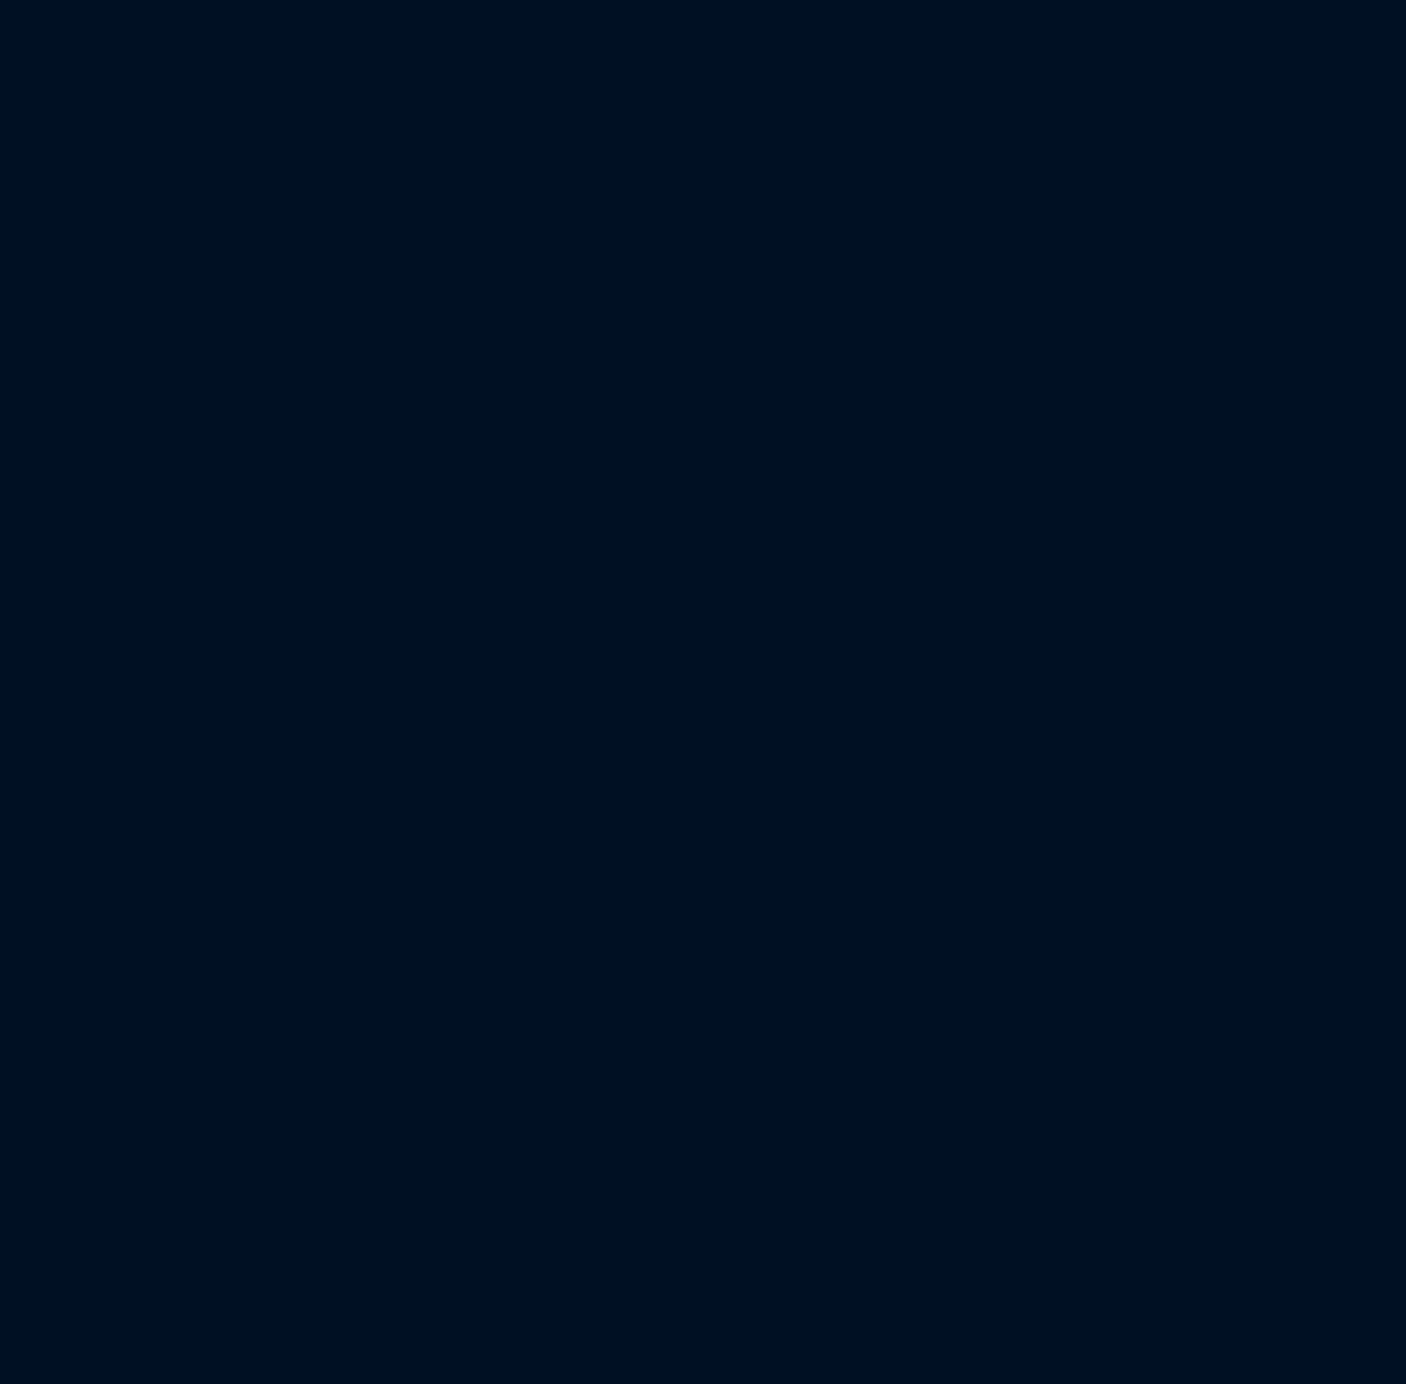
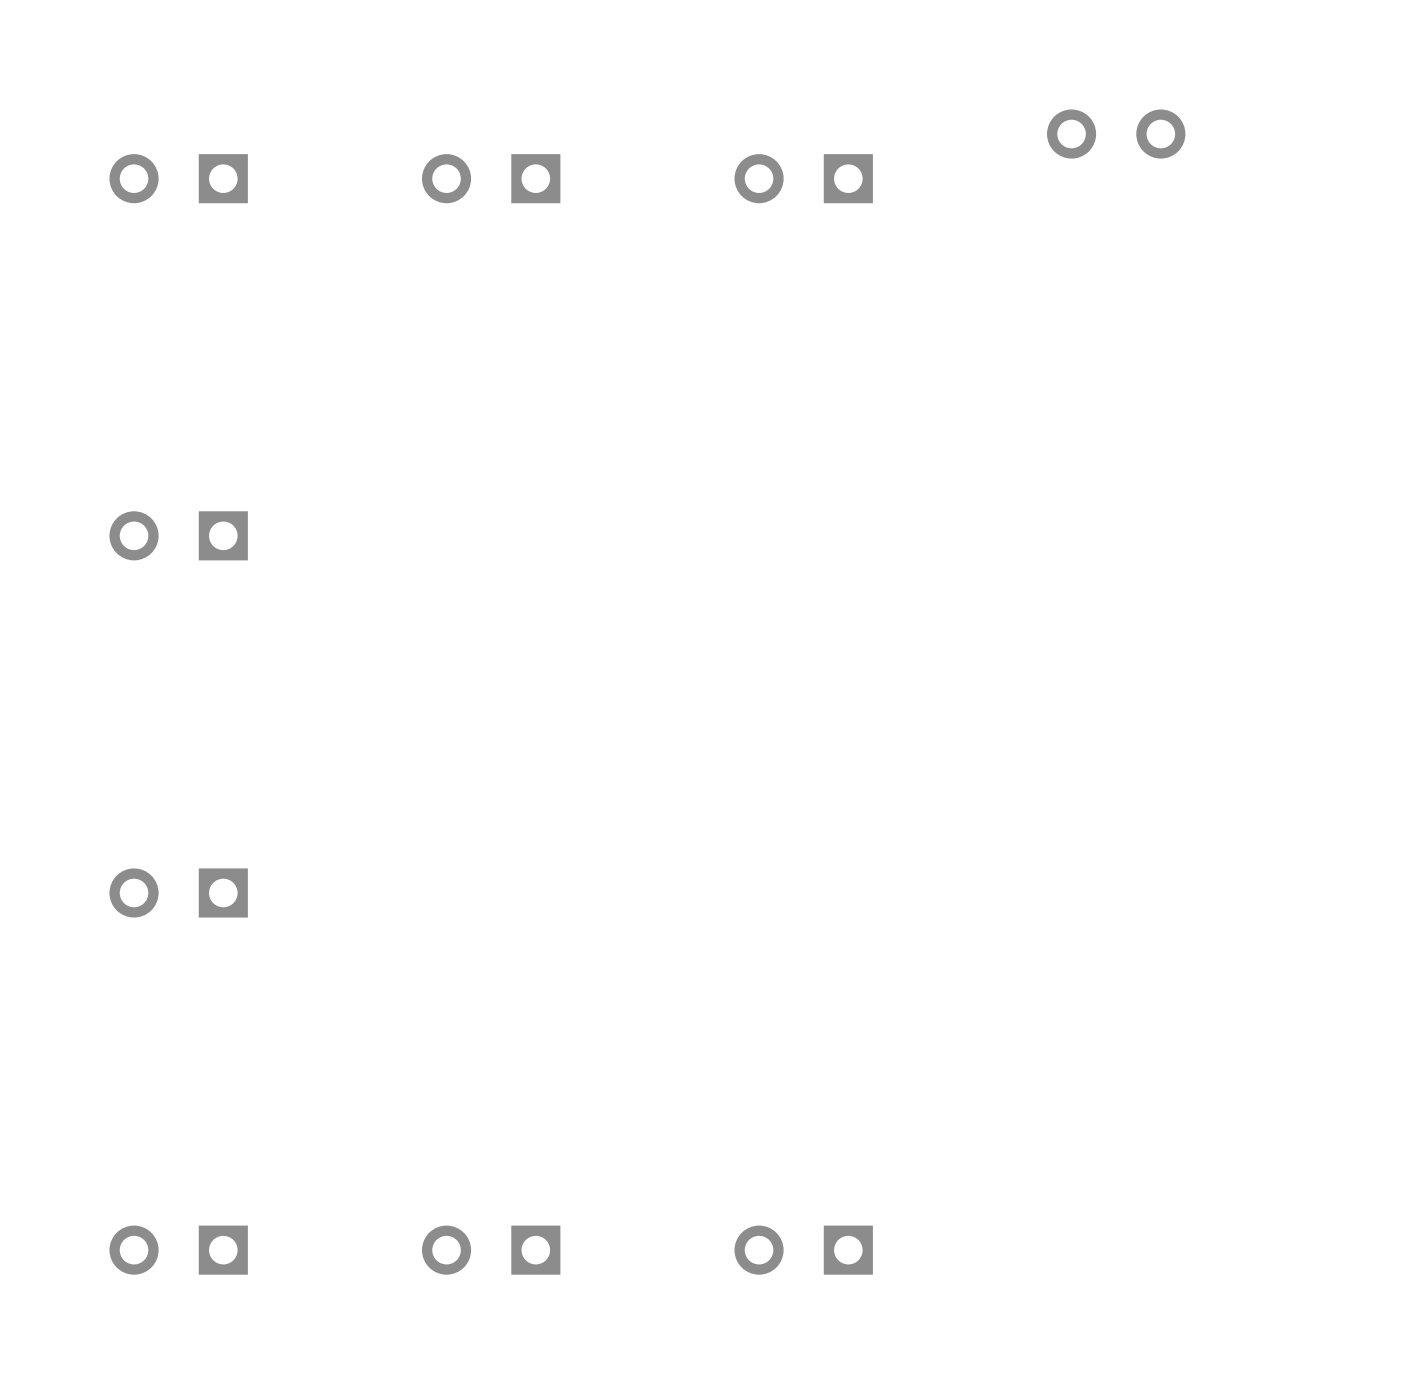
part: none -> (1116, 134)
part: none -> (178, 178)
part: none -> (491, 178)
part: none -> (803, 178)
part: none -> (178, 535)
part: none -> (178, 892)
part: none -> (178, 1250)
part: none -> (491, 1250)
part: none -> (803, 1250)

